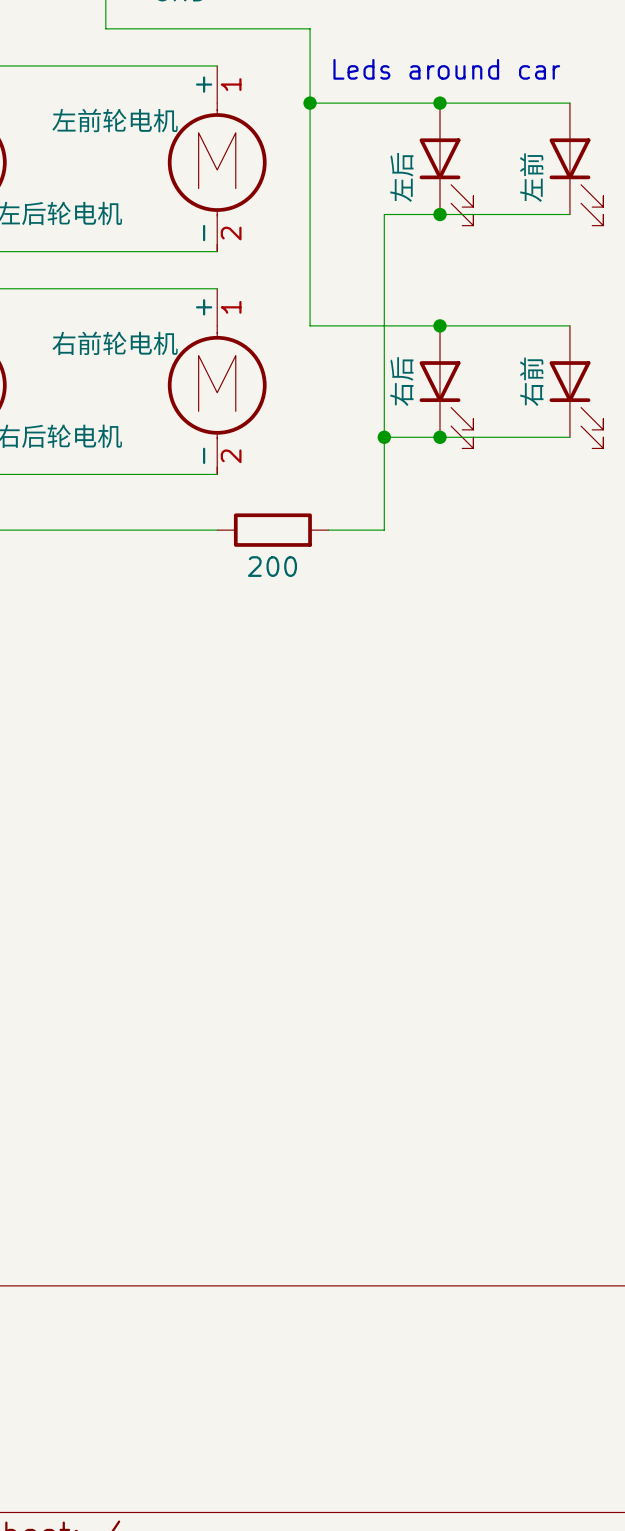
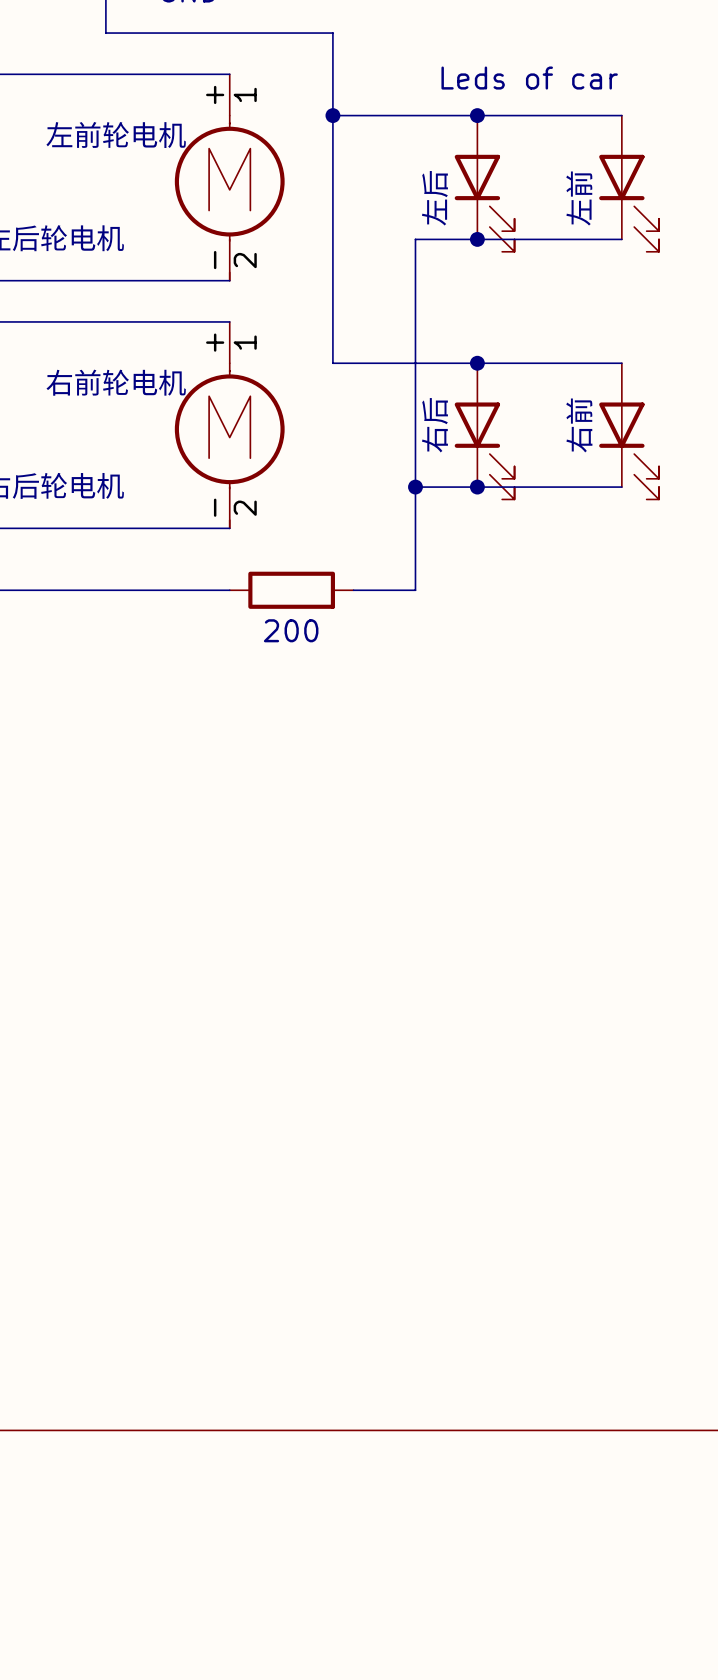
text: Leds around car (446, 69) -> Leds of car (529, 78)

